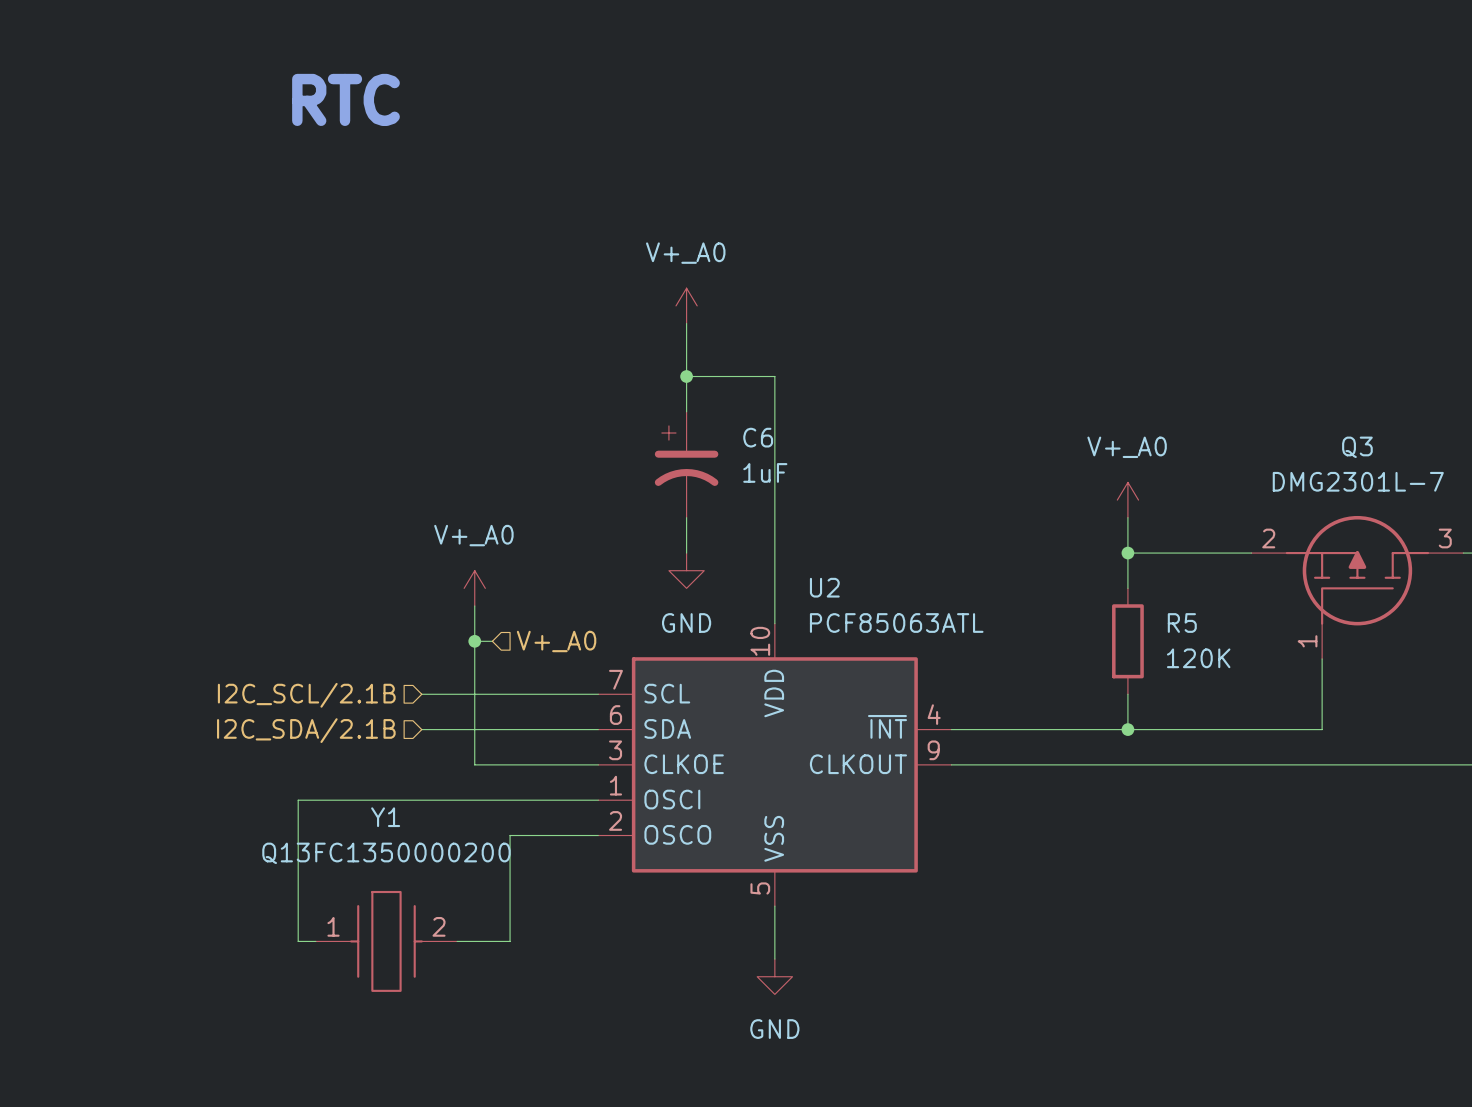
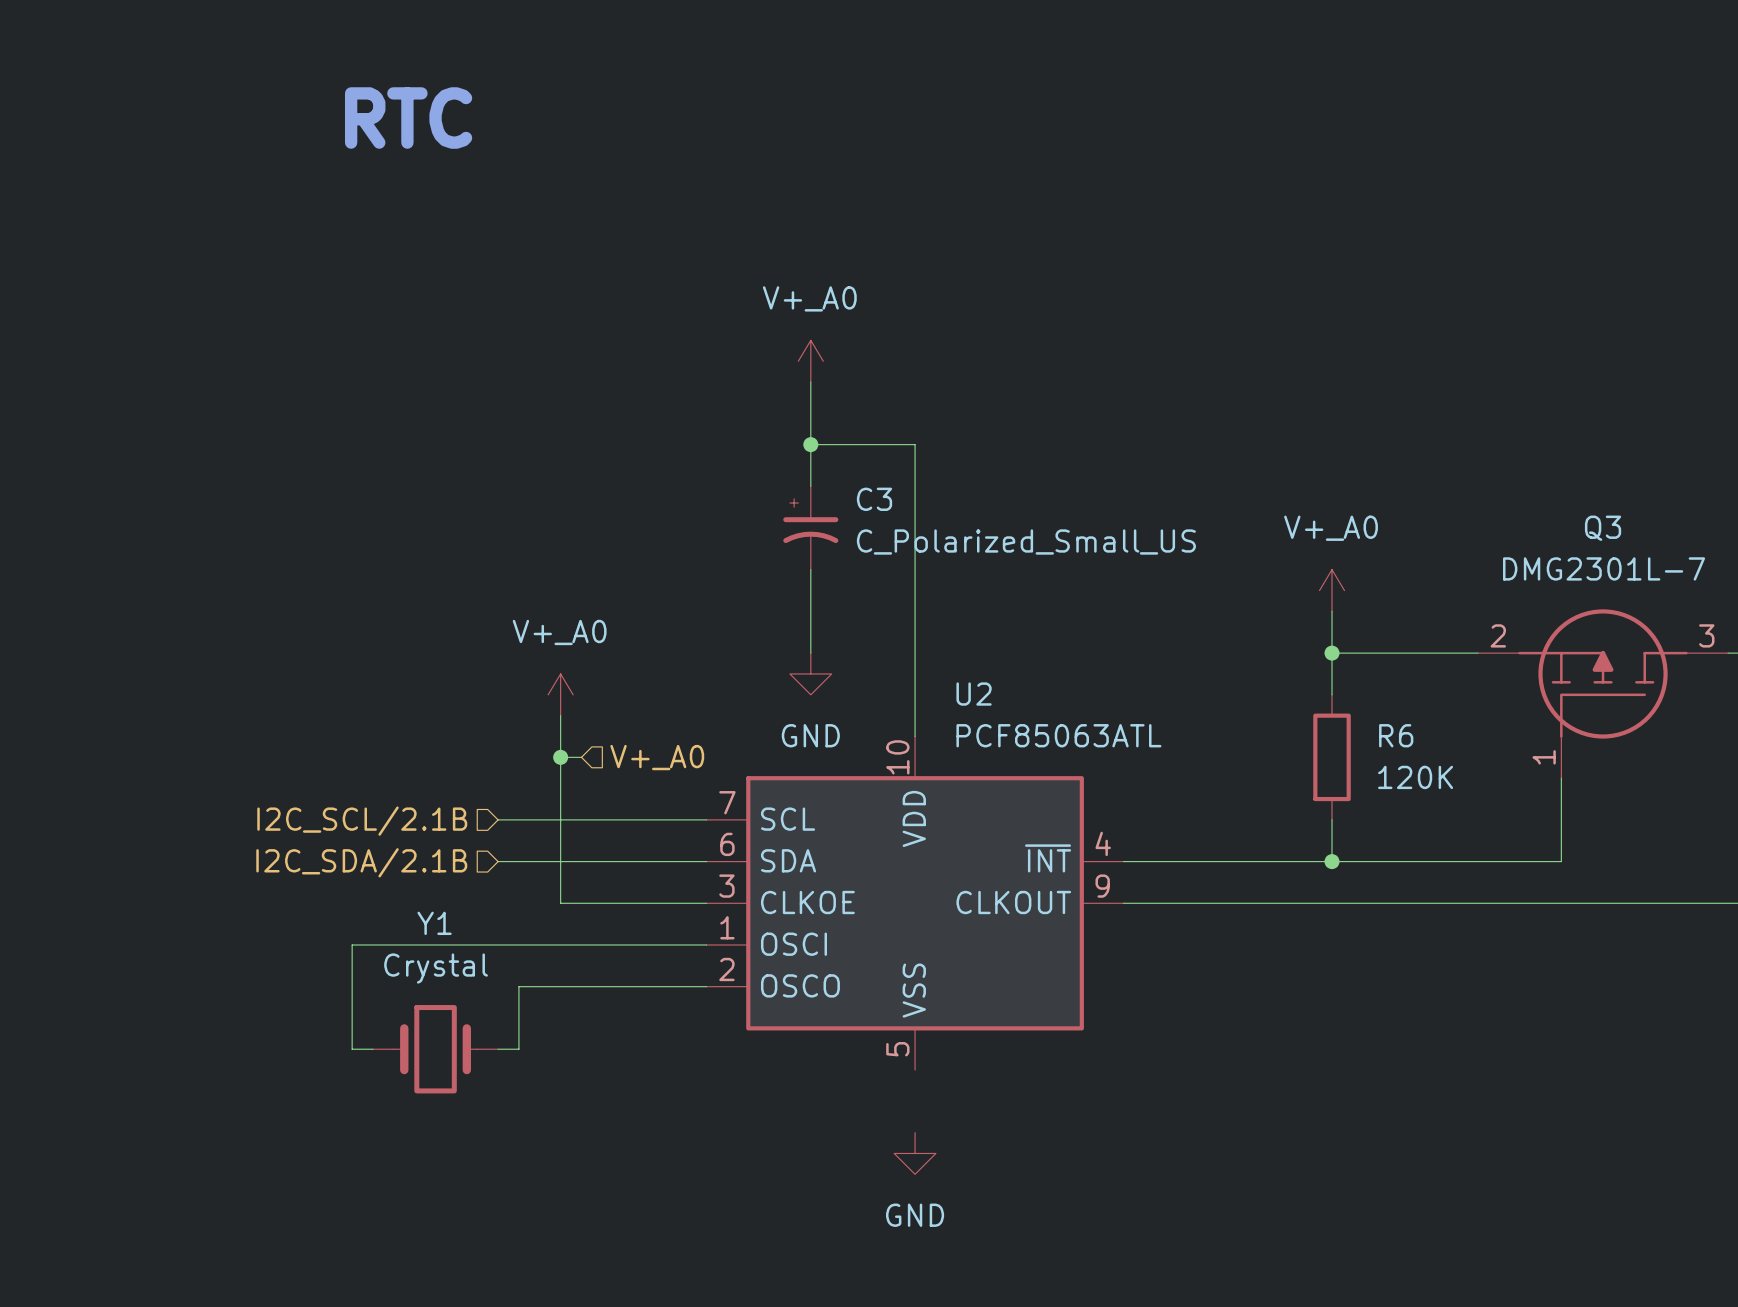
C3: none -> C_Polarized_Small_US (810, 528)
C6: 1uF (686, 464) -> none
R5 name: R5 (1182, 623) -> R6 (1396, 735)
wire: (510, 835) (510, 941) (457, 941) -> (602, 986) (518, 986) (518, 1049) (498, 1049)
Y1 value: Q13FC1350000200 (386, 853) -> Crystal (436, 968)
wire: (298, 888) (298, 941) (315, 941) -> (352, 1049) (373, 1049)
Y1 symbol: [315, 890, 458, 992] -> [373, 1005, 499, 1094]
wire: (774, 906) (774, 959) -> none

